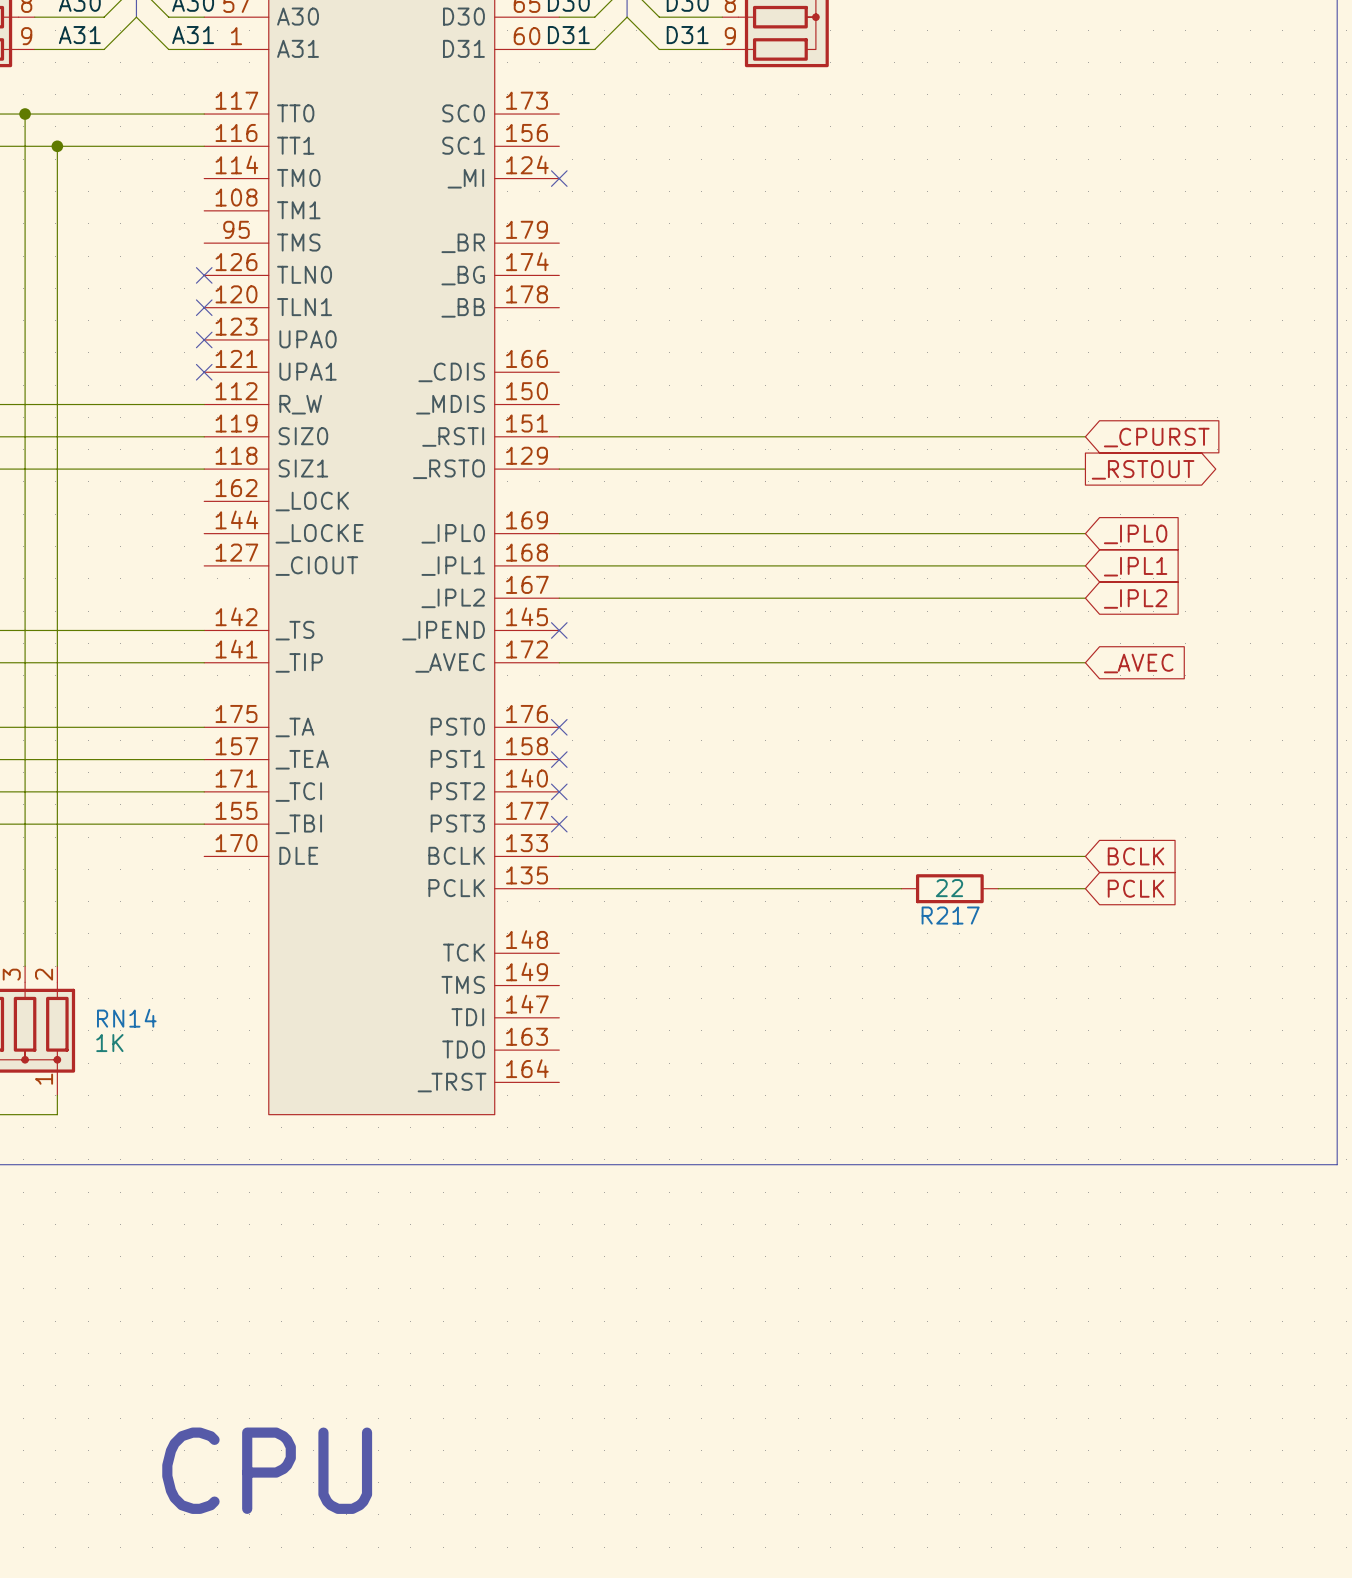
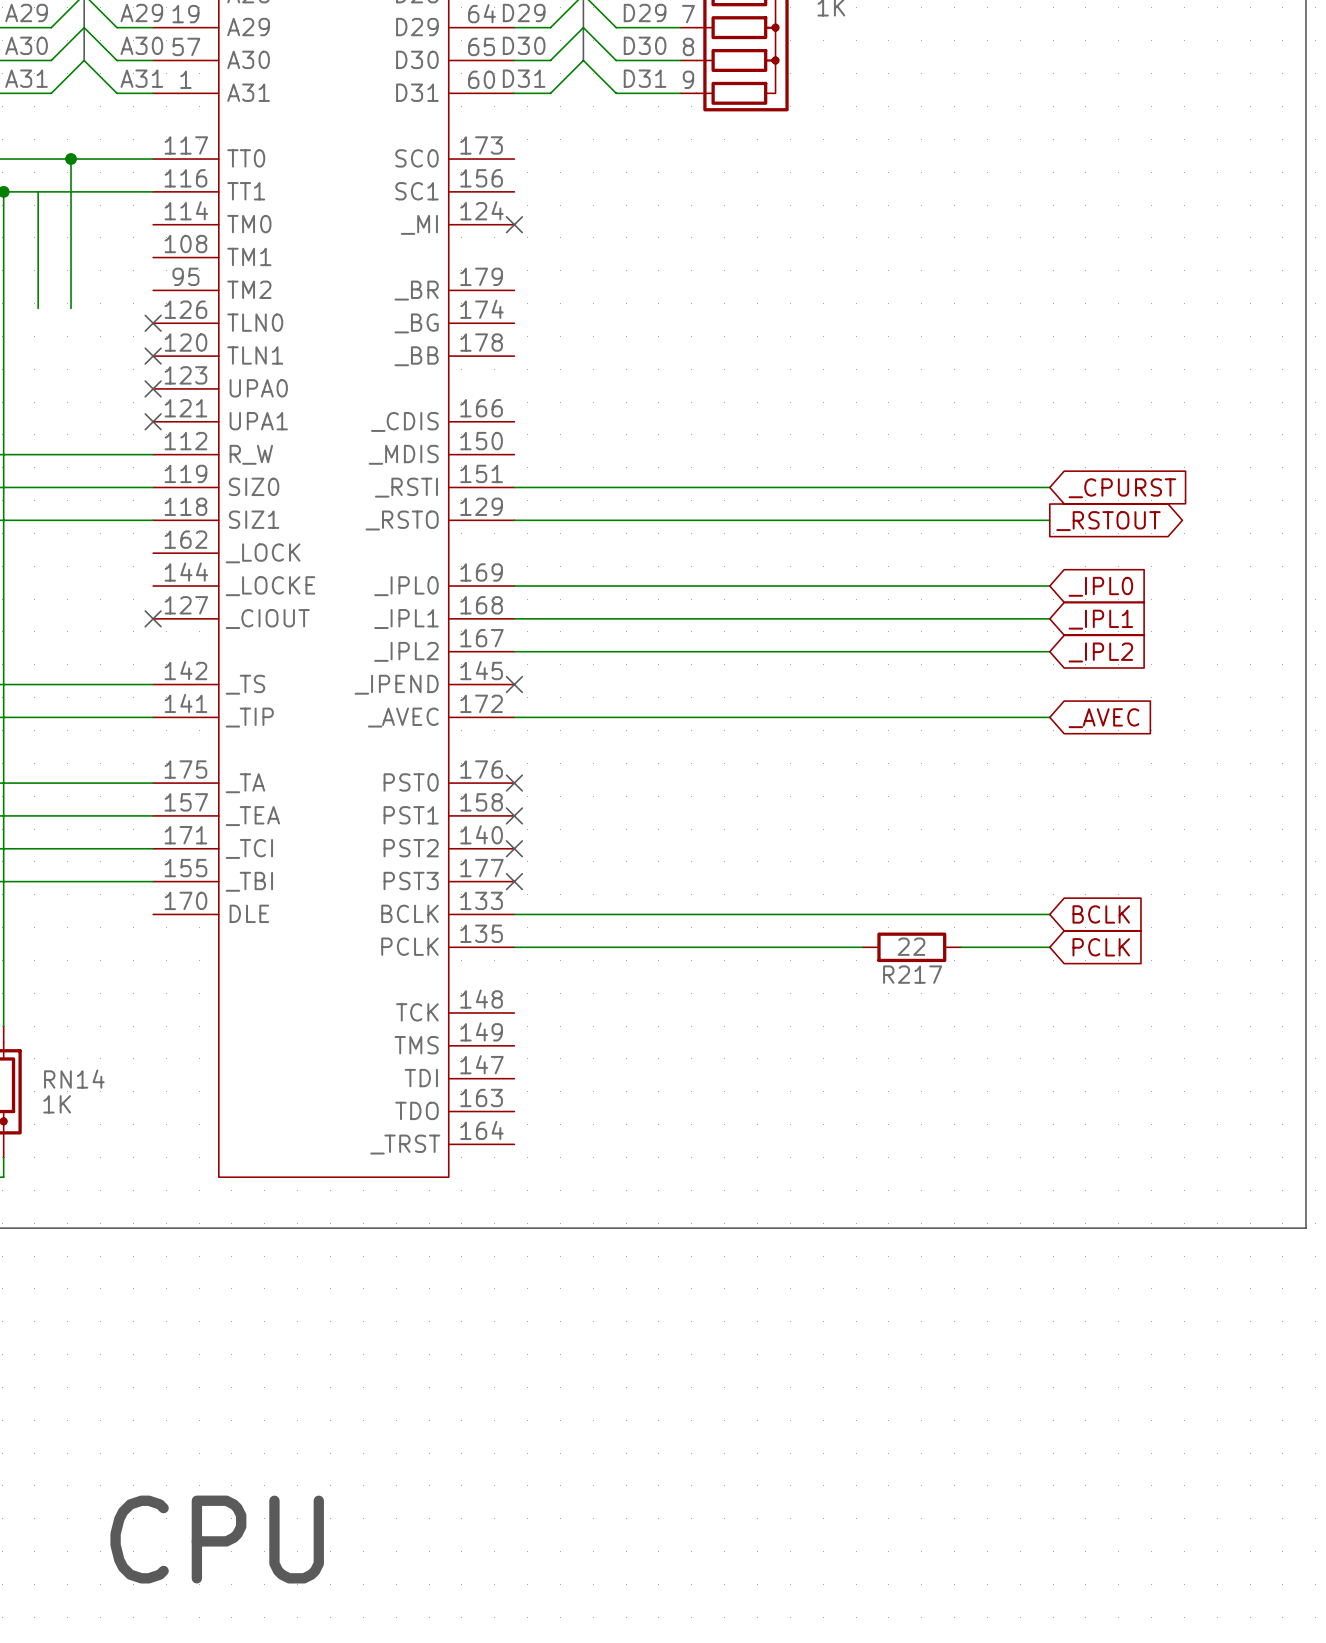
wire: none -> (71, 159) (71, 308)
junction: none -> (71, 159)
wire: none -> (38, 191) (38, 308)
part pin name: TMS (298, 242) -> TM2 (249, 289)
no-connect mark: none -> (153, 618)

